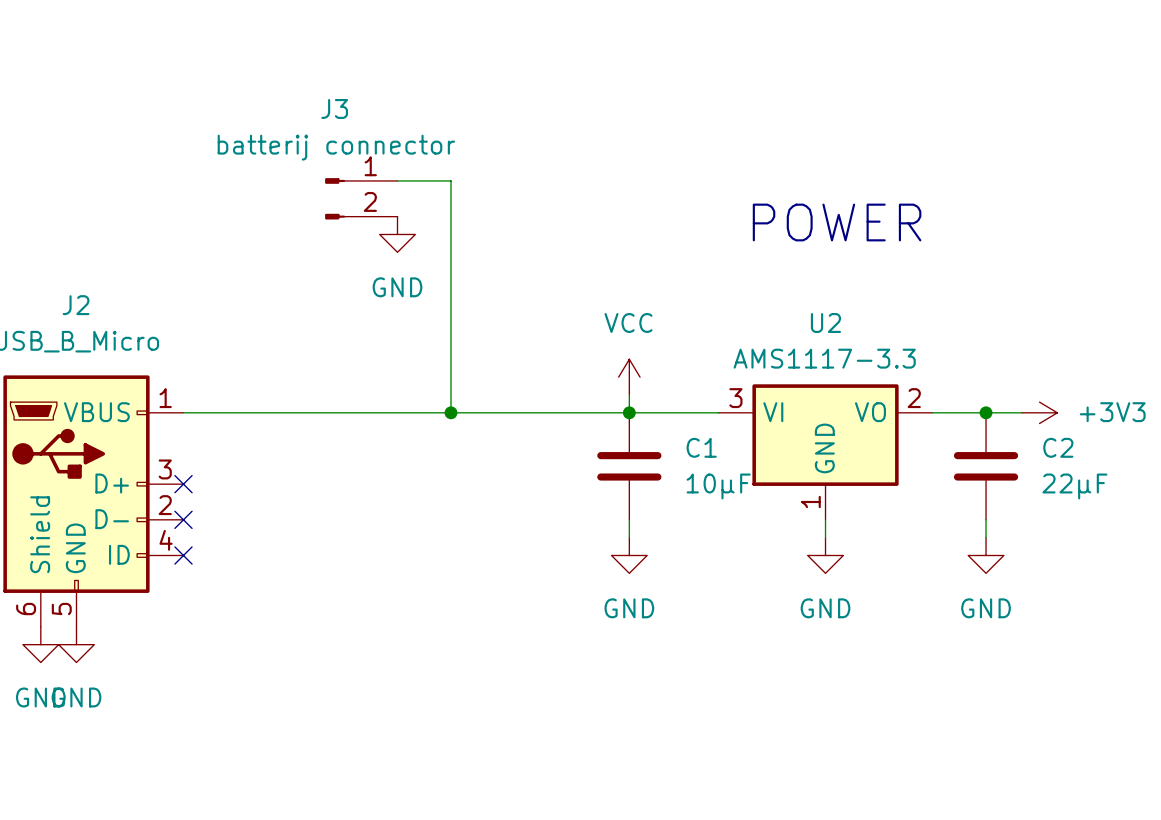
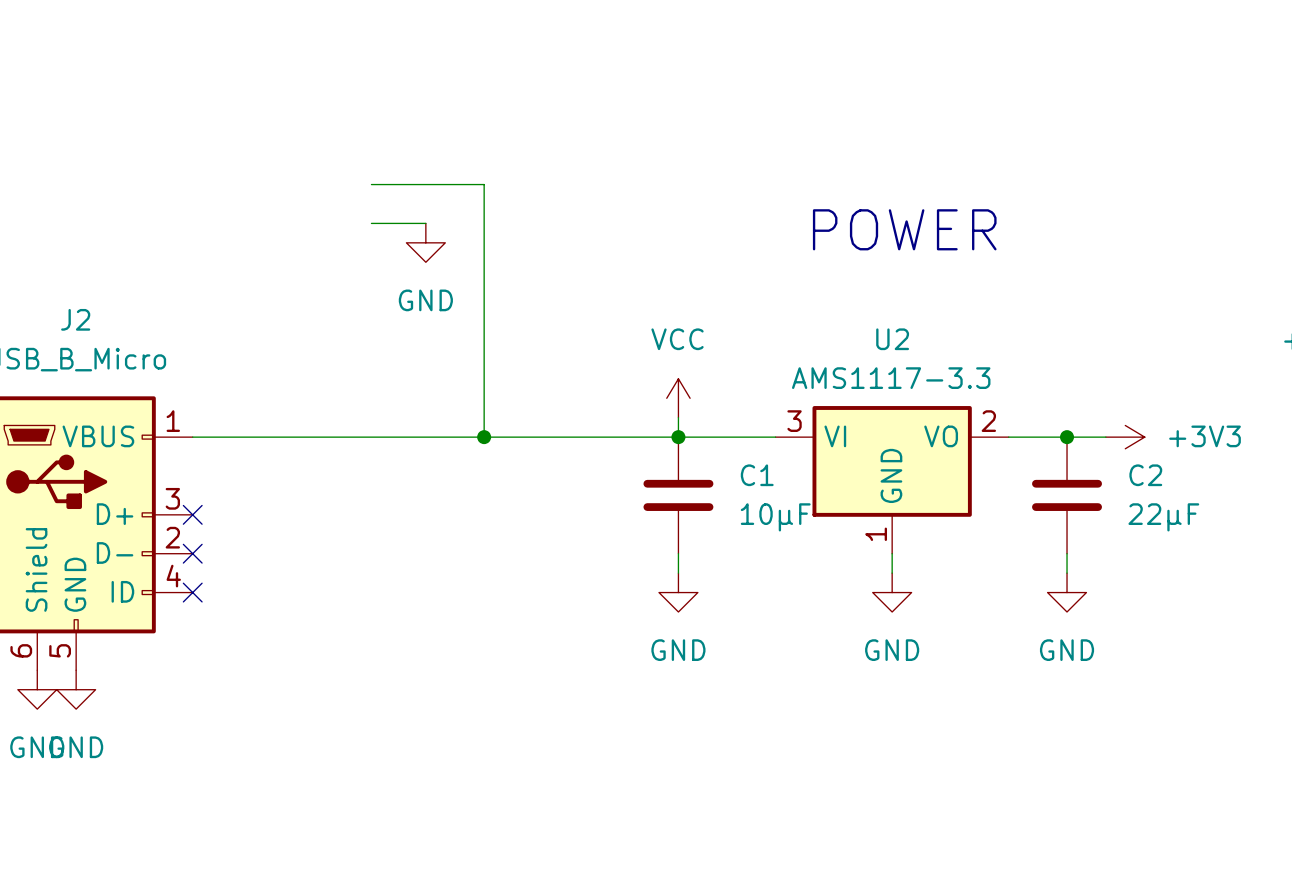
J3: batterij connector (361, 198) -> none

